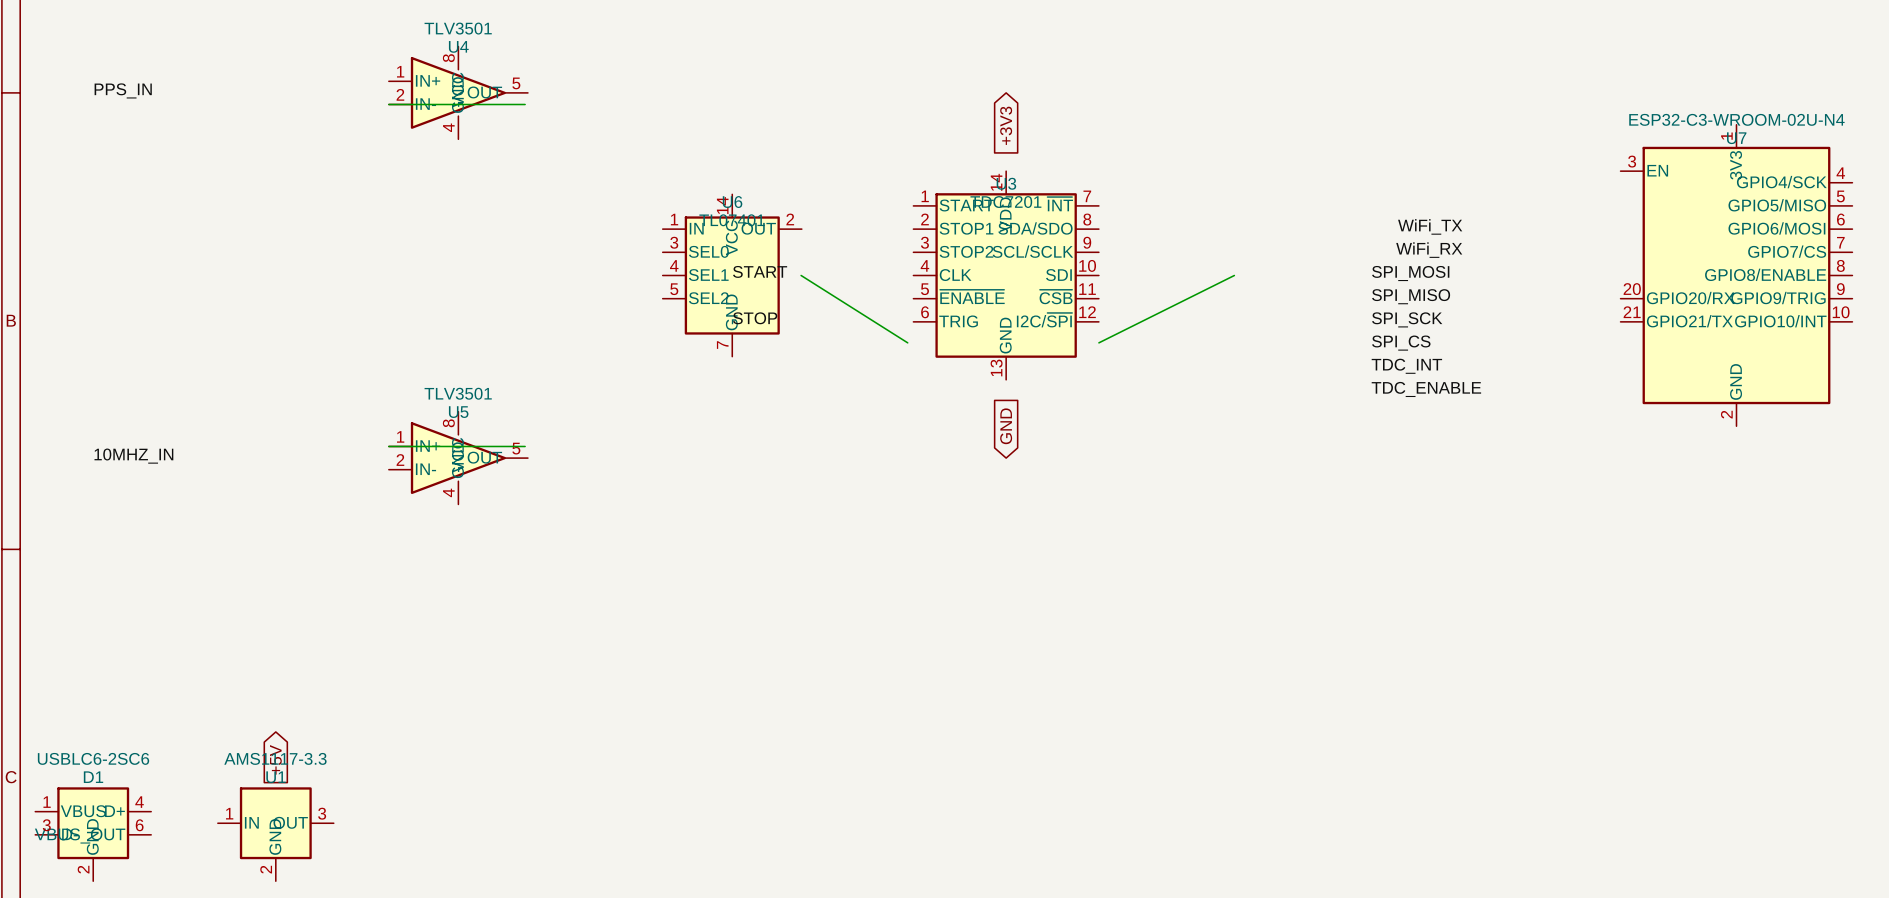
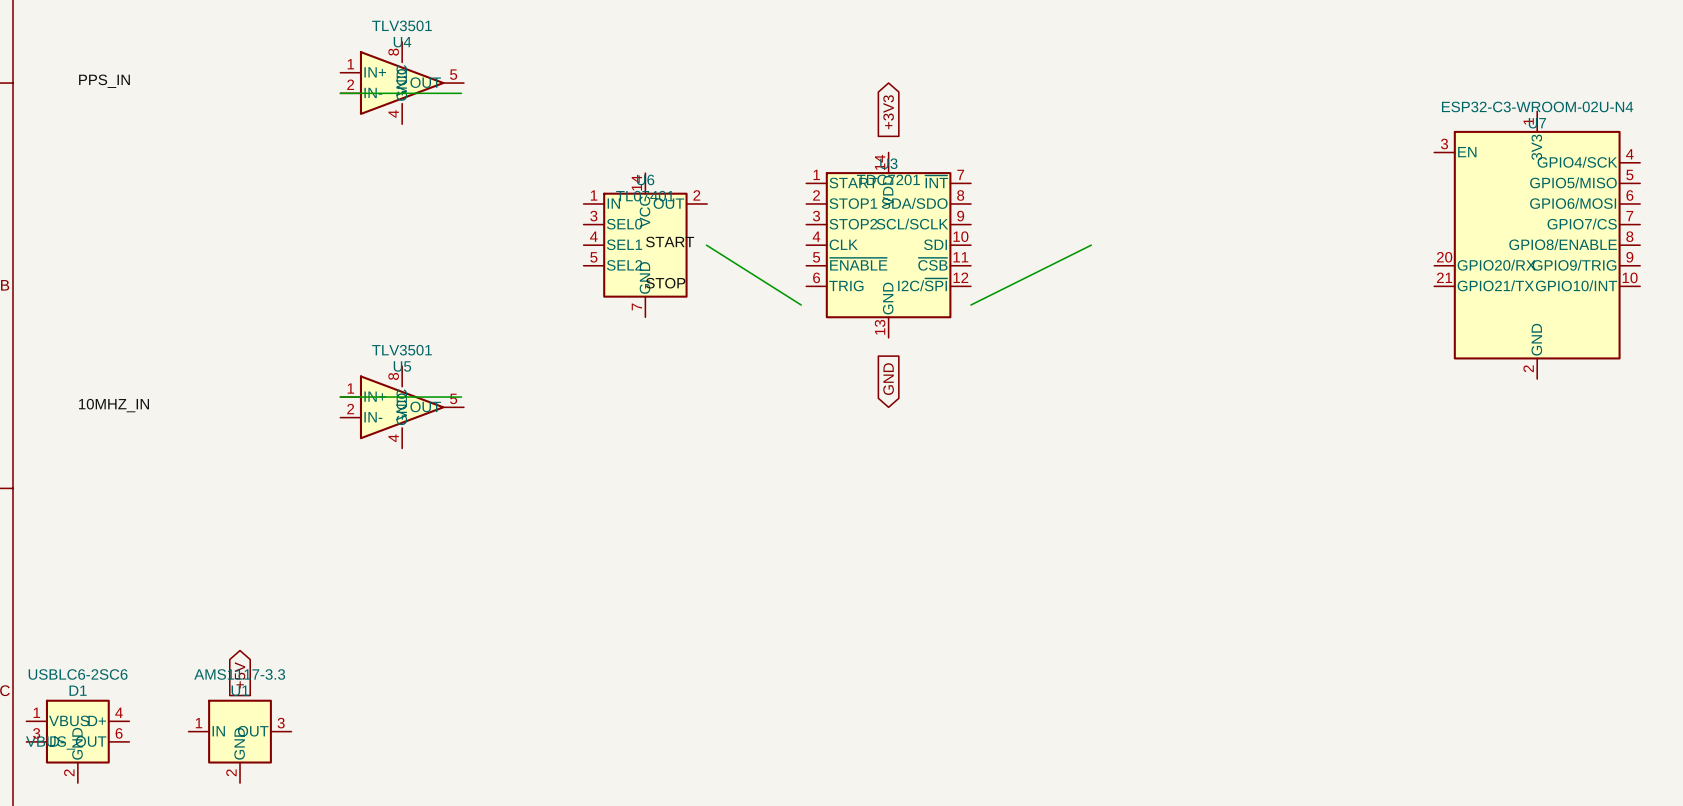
label: WiFi_TX (1430, 226) -> none
label: WiFi_RX (1429, 250) -> none
label: SPI_MOSI (1410, 273) -> none
label: SPI_MISO (1411, 296) -> none
label: SPI_SCK (1407, 319) -> none
label: SPI_CS (1401, 343) -> none
label: TDC_INT (1406, 366) -> none
label: TDC_ENABLE (1426, 389) -> none

